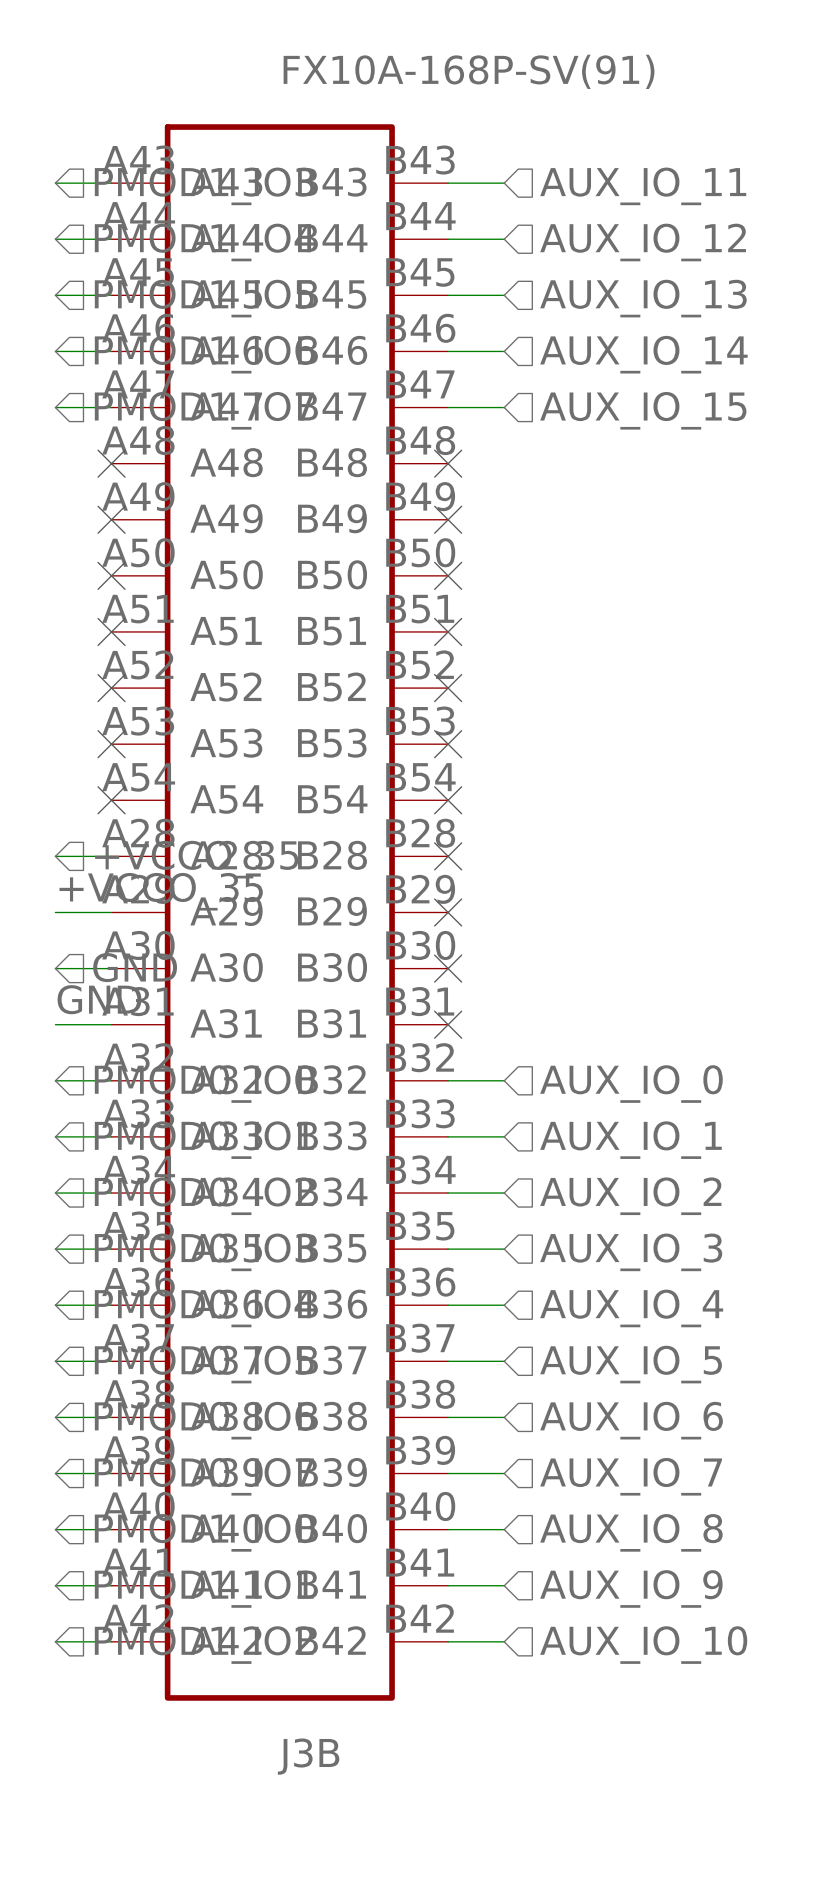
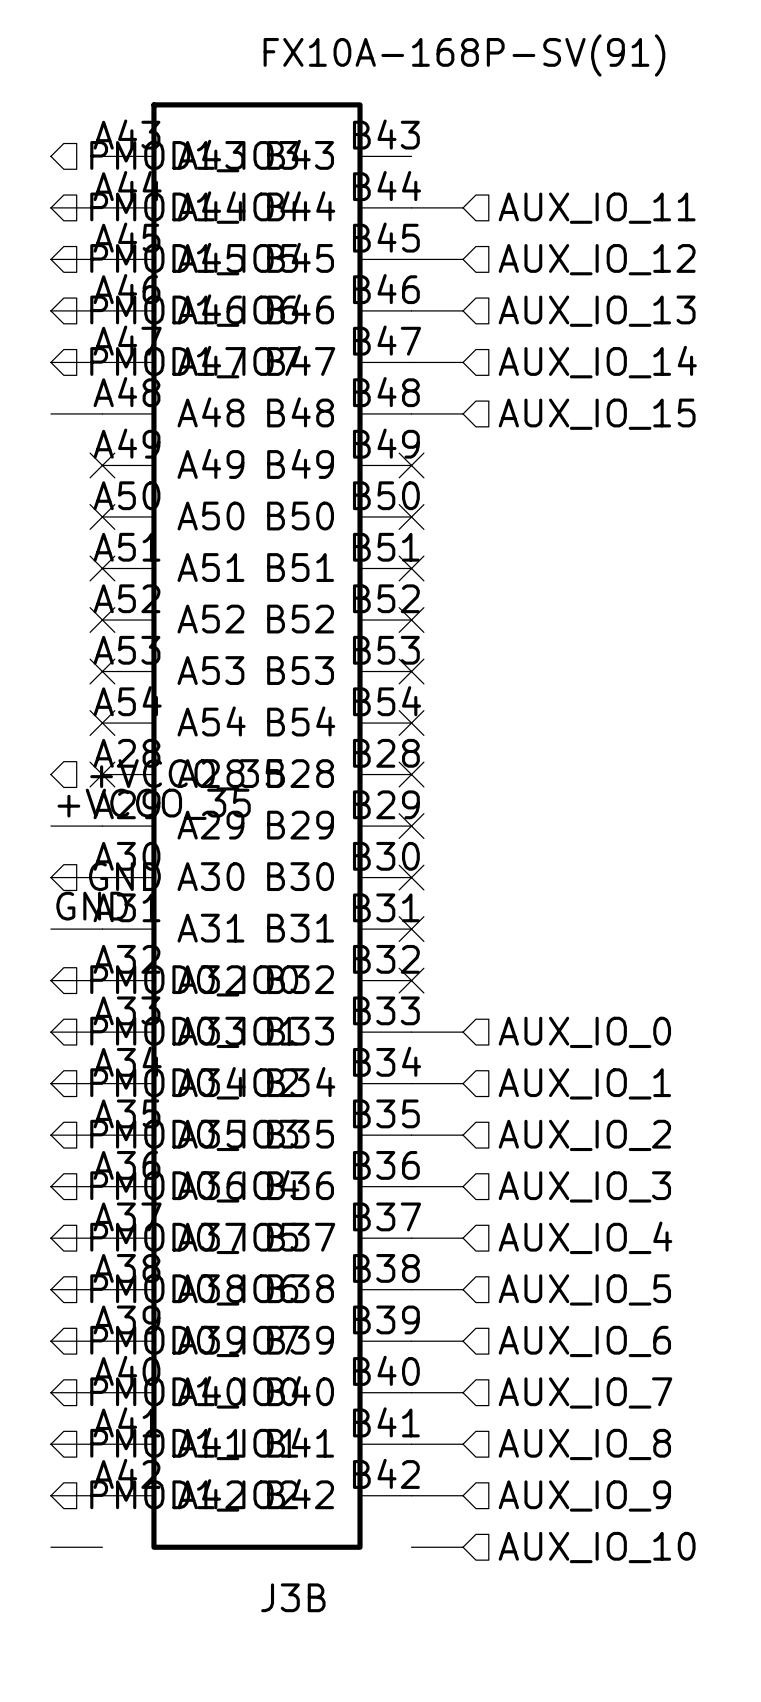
wire: (55, 183) (111, 183) -> (50, 413) (102, 413)
wire: (448, 183) (504, 183) -> (411, 413) (463, 413)
hierarchical label: AUX_IO_11 (643, 186) -> none
hierarchical label: AUX_IO_12 (643, 242) -> AUX_IO_11 (597, 208)
hierarchical label: AUX_IO_13 (643, 298) -> AUX_IO_12 (597, 259)
hierarchical label: AUX_IO_14 (643, 354) -> AUX_IO_13 (597, 311)
hierarchical label: AUX_IO_15 (643, 410) -> AUX_IO_14 (597, 362)
no-connect mark: (111, 463) -> none
no-connect mark: (448, 463) -> none
hierarchical label: none -> AUX_IO_15 (597, 414)
wire: (55, 856) (111, 856) -> none
no-connect mark: none -> (102, 774)
wire: (448, 1080) (504, 1080) -> none
no-connect mark: none -> (411, 980)
hierarchical label: AUX_IO_0 (631, 1084) -> none
hierarchical label: AUX_IO_1 (630, 1140) -> AUX_IO_0 (584, 1032)
hierarchical label: AUX_IO_2 (630, 1196) -> AUX_IO_1 (584, 1083)
hierarchical label: AUX_IO_3 (631, 1252) -> AUX_IO_2 (584, 1135)
hierarchical label: AUX_IO_4 (631, 1308) -> AUX_IO_3 (584, 1186)
hierarchical label: AUX_IO_5 (631, 1364) -> AUX_IO_4 (585, 1237)
hierarchical label: AUX_IO_6 (631, 1420) -> AUX_IO_5 (584, 1289)
hierarchical label: AUX_IO_7 (631, 1476) -> AUX_IO_6 (584, 1341)
hierarchical label: AUX_IO_8 (631, 1532) -> AUX_IO_7 (585, 1392)
hierarchical label: AUX_IO_9 (631, 1588) -> AUX_IO_8 (584, 1444)
hierarchical label: AUX_IO_10 (643, 1645) -> AUX_IO_9 (584, 1496)
wire: none -> (50, 1547) (102, 1547)
wire: none -> (411, 1547) (463, 1547)
hierarchical label: none -> AUX_IO_10 (597, 1547)

